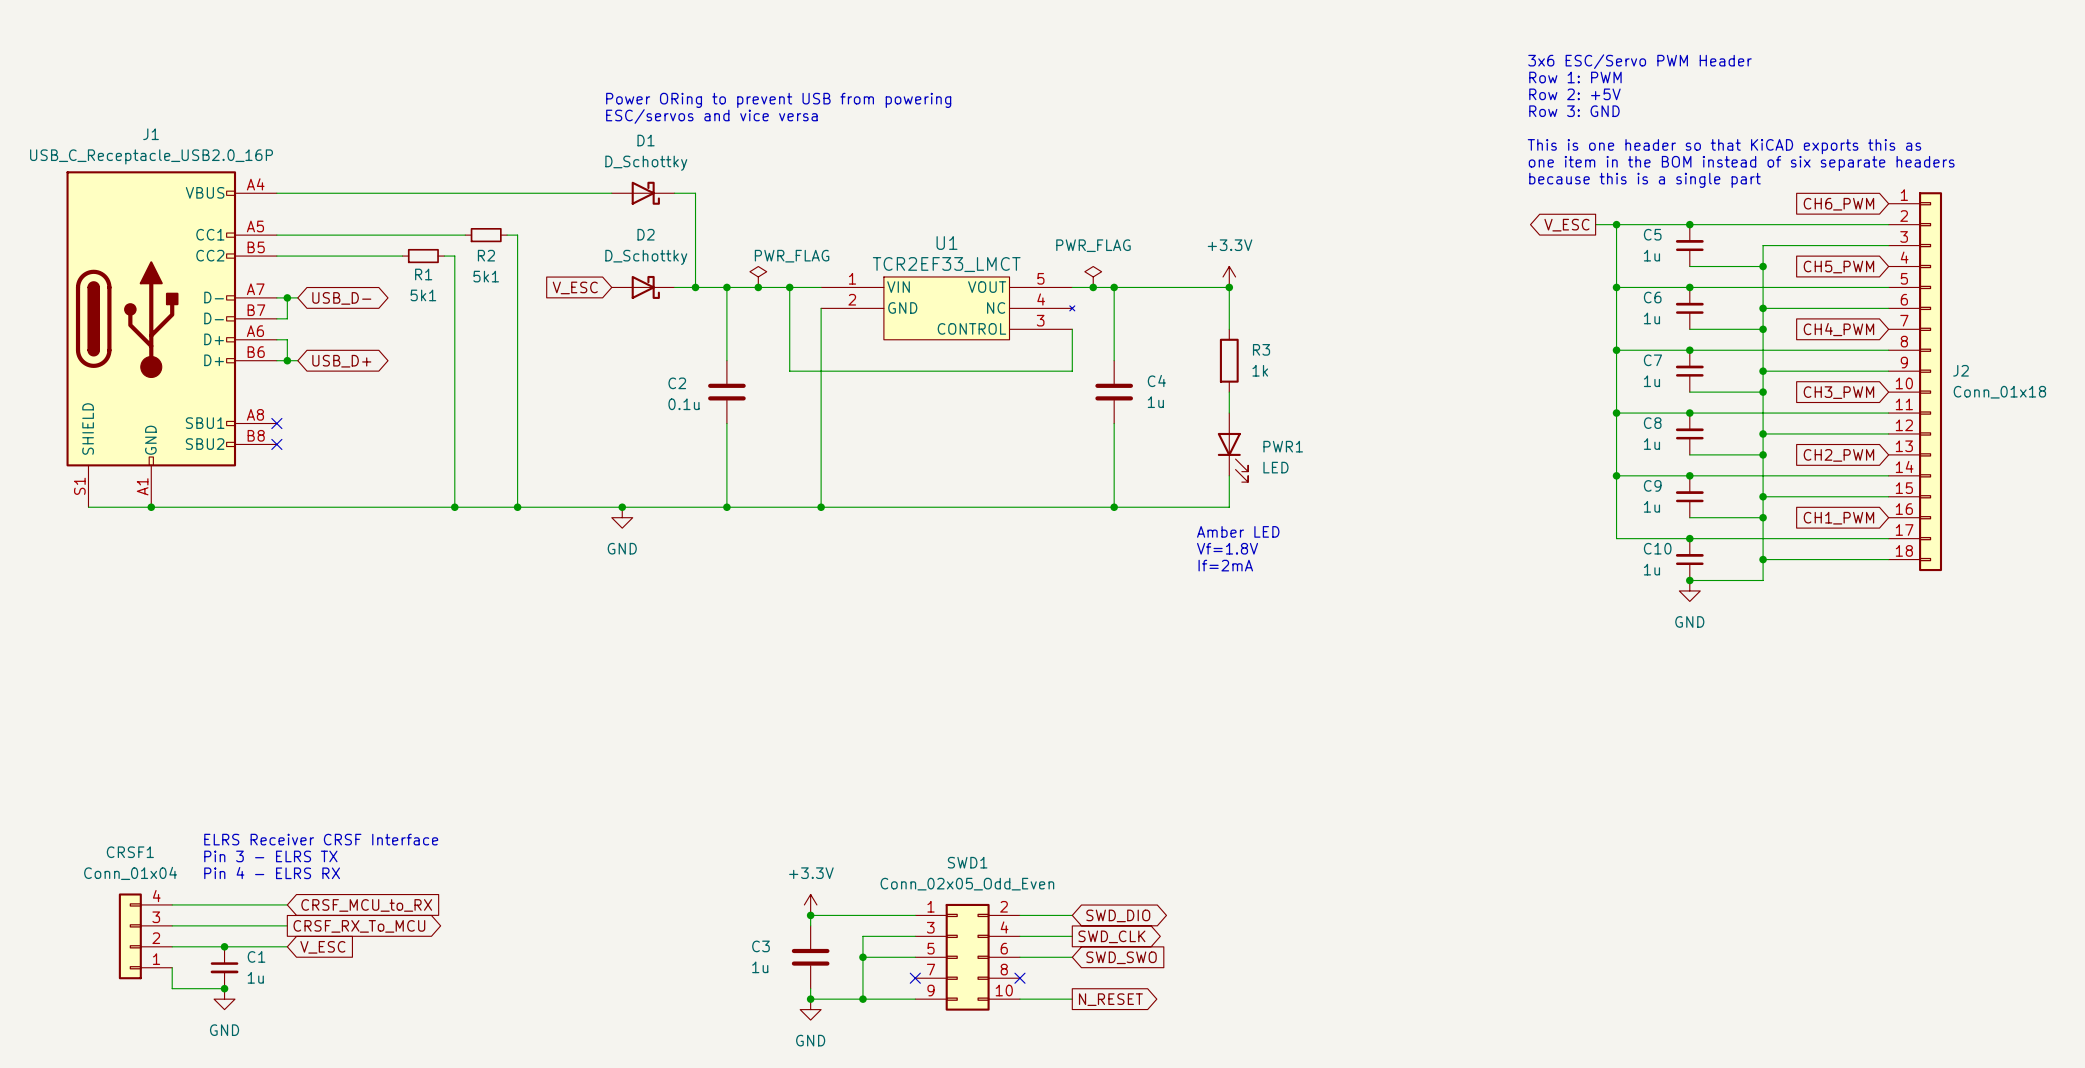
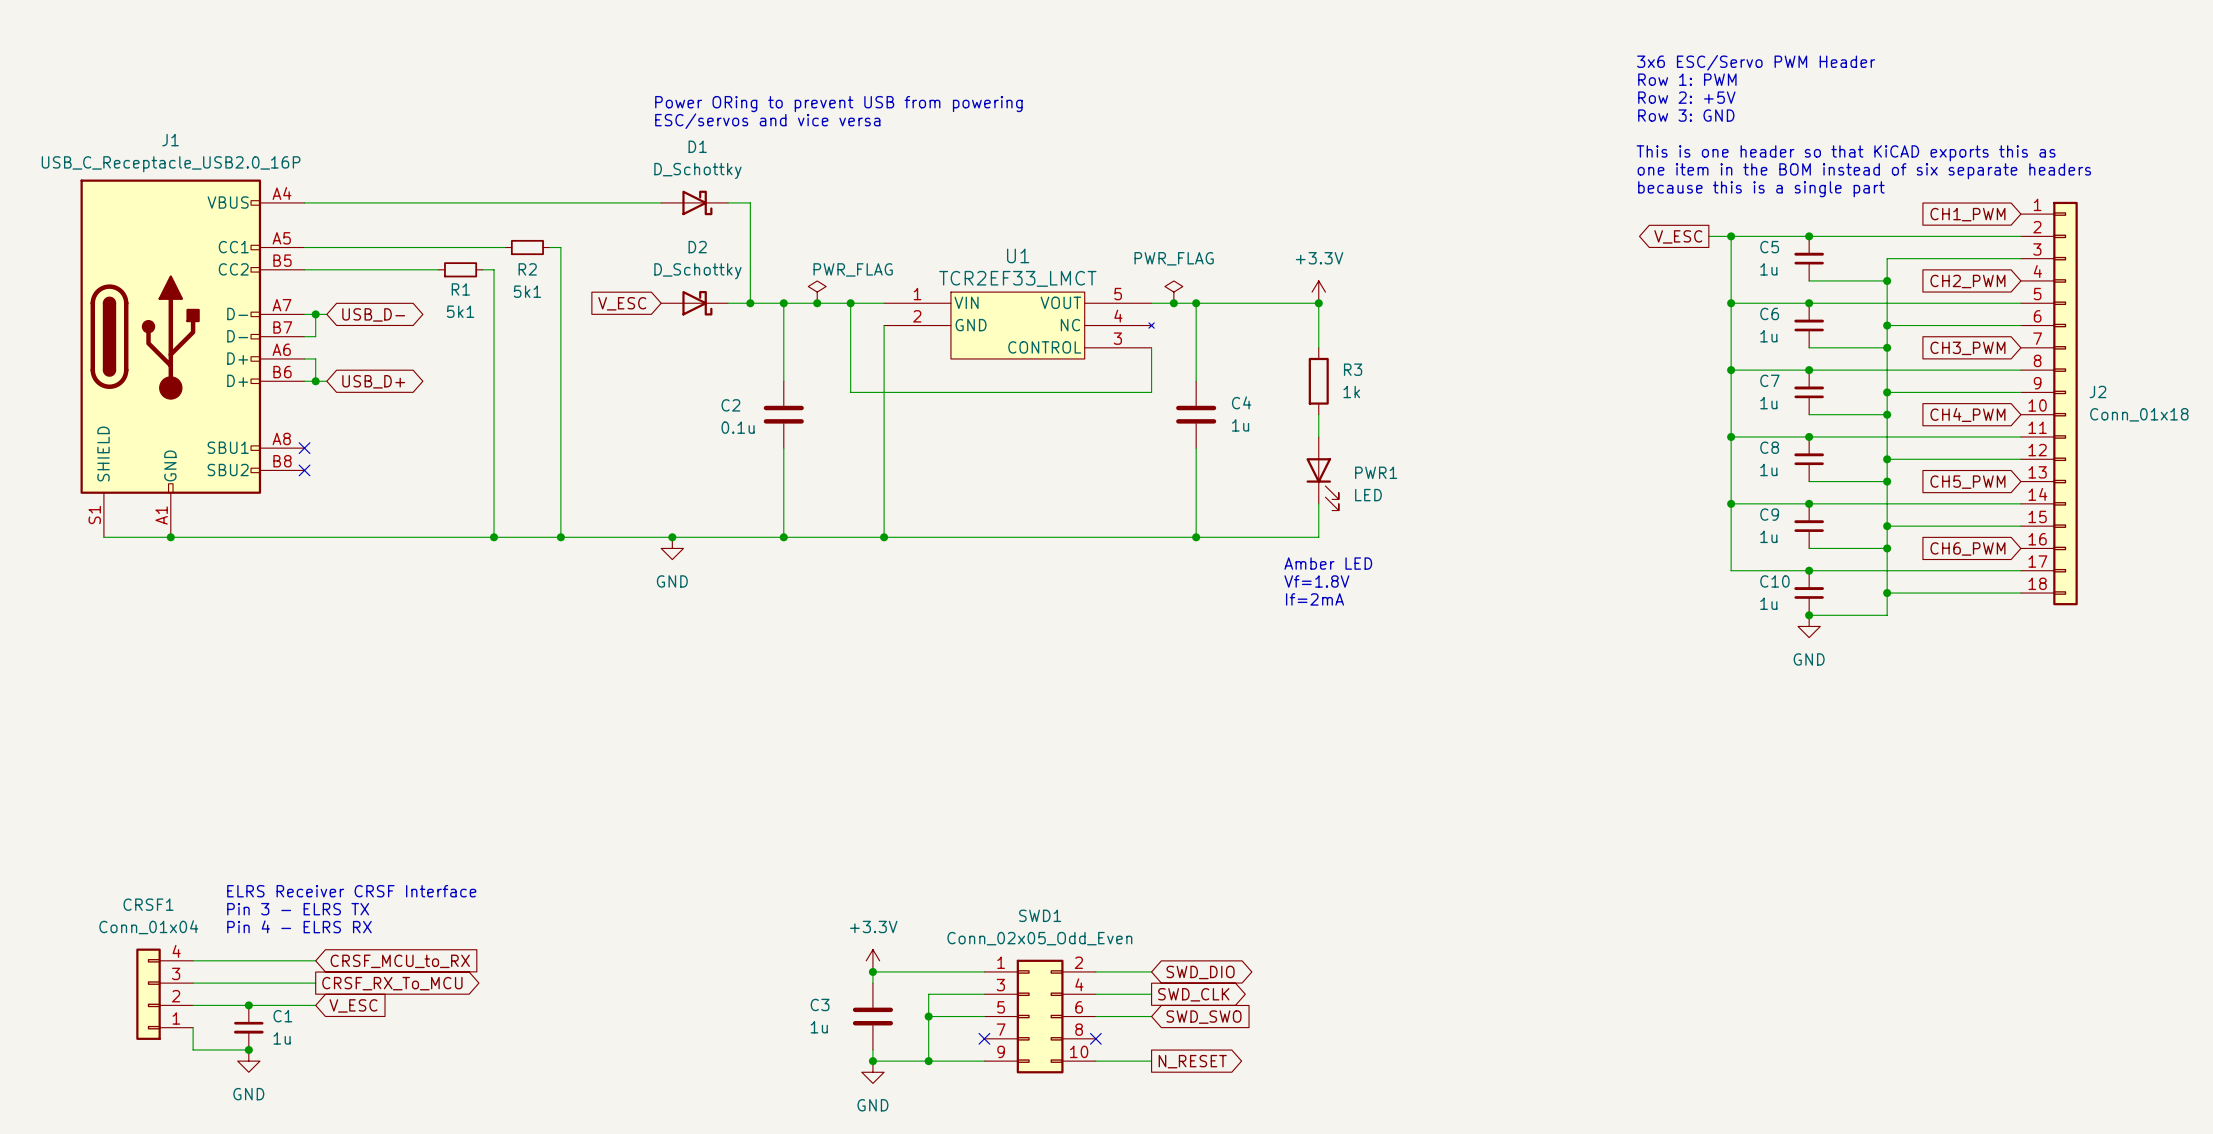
global label: CH6_PWM (1838, 204) -> CH1_PWM (1967, 214)
global label: CH5_PWM (1838, 267) -> CH2_PWM (1967, 281)
global label: CH4_PWM (1838, 329) -> CH3_PWM (1967, 348)
global label: CH3_PWM (1838, 392) -> CH4_PWM (1967, 414)
global label: CH2_PWM (1838, 455) -> CH5_PWM (1967, 482)
global label: CH1_PWM (1838, 518) -> CH6_PWM (1967, 548)

